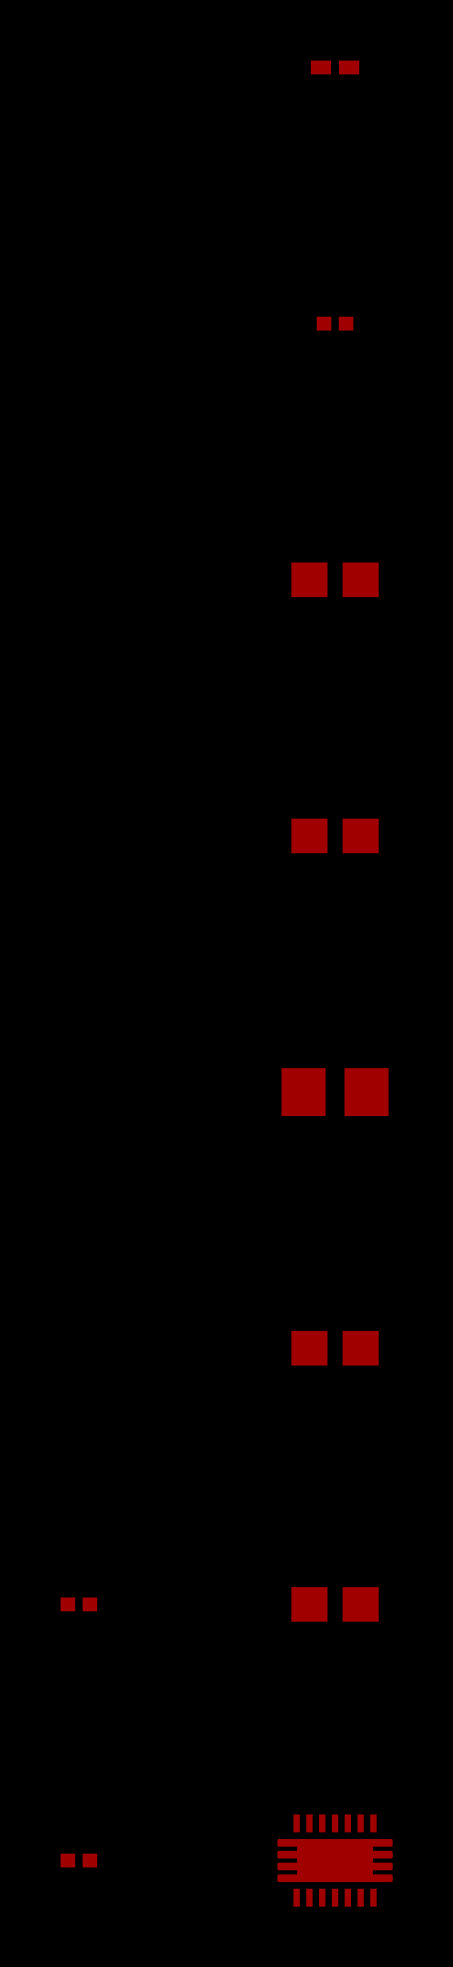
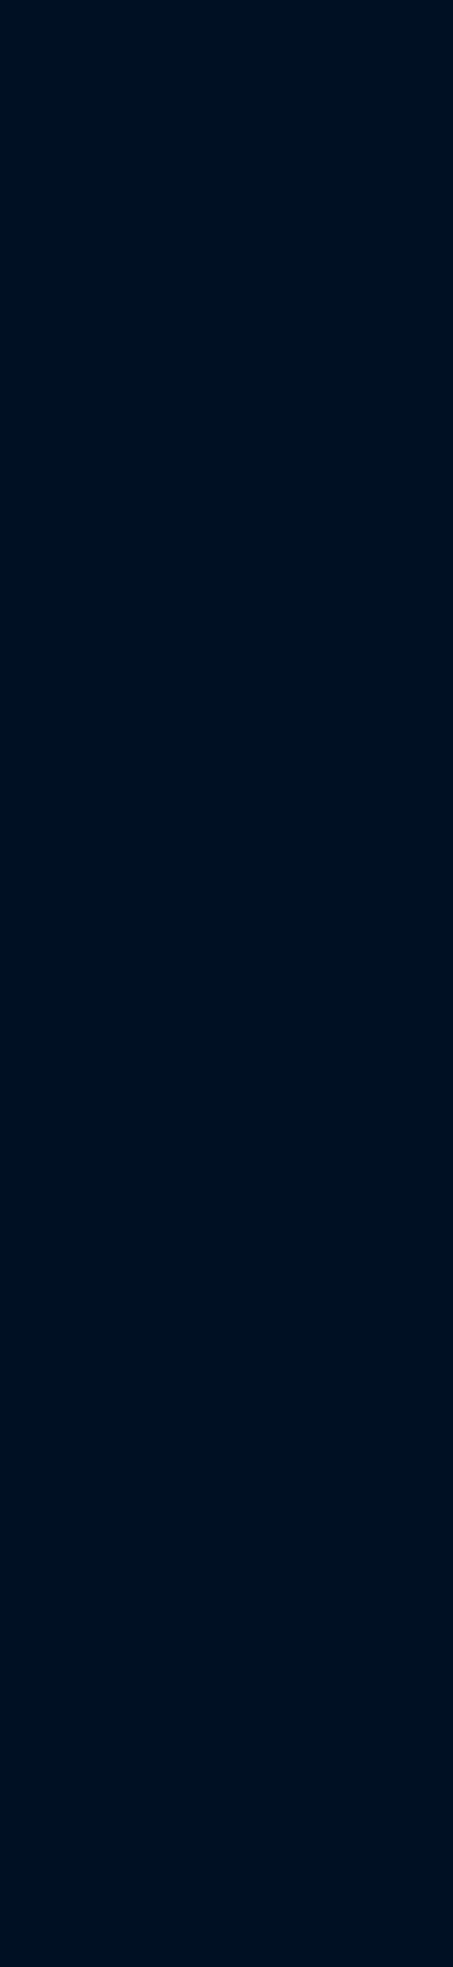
part: (335, 67) -> none
part: (335, 323) -> none
part: (335, 579) -> none
part: (335, 835) -> none
part: (335, 1092) -> none
part: (335, 1348) -> none
part: (78, 1604) -> none
part: (335, 1604) -> none
part: (78, 1860) -> none
part: (335, 1860) -> none

